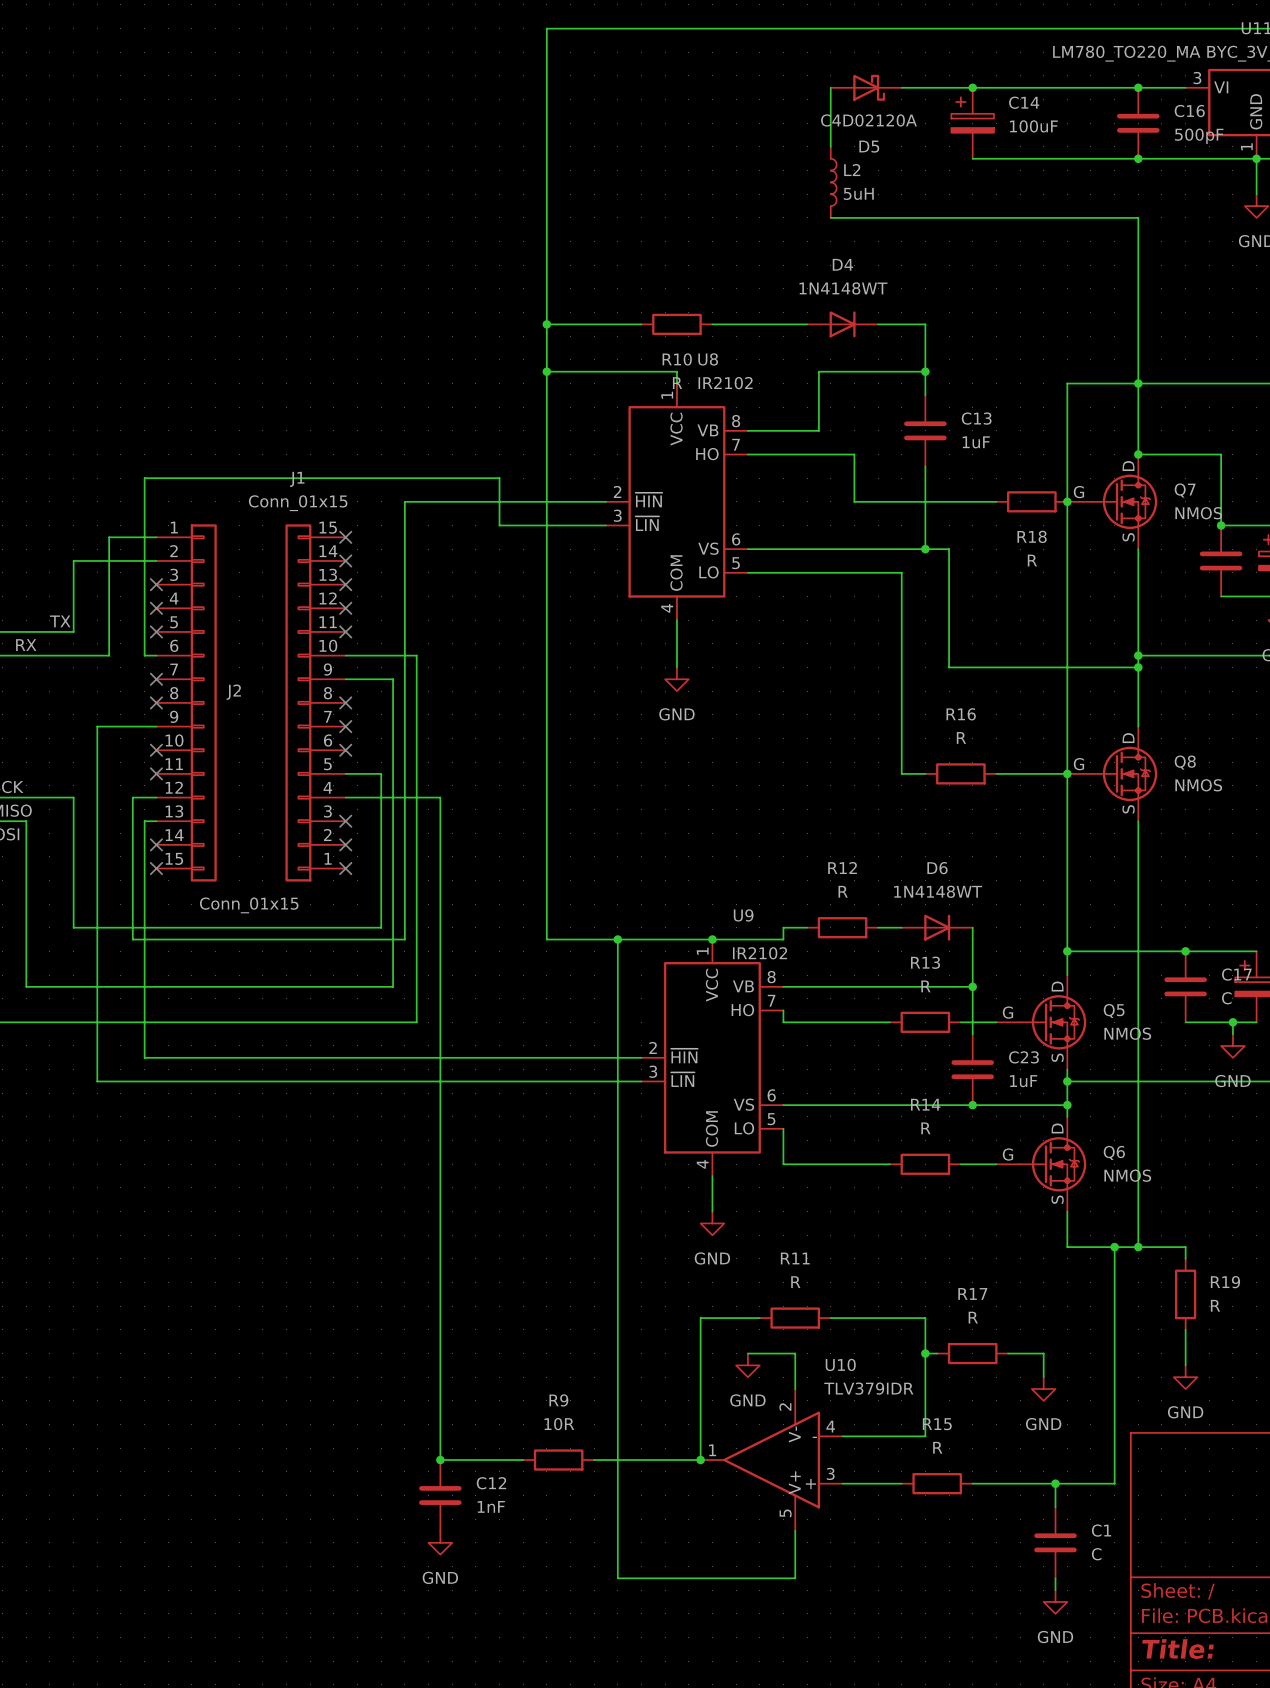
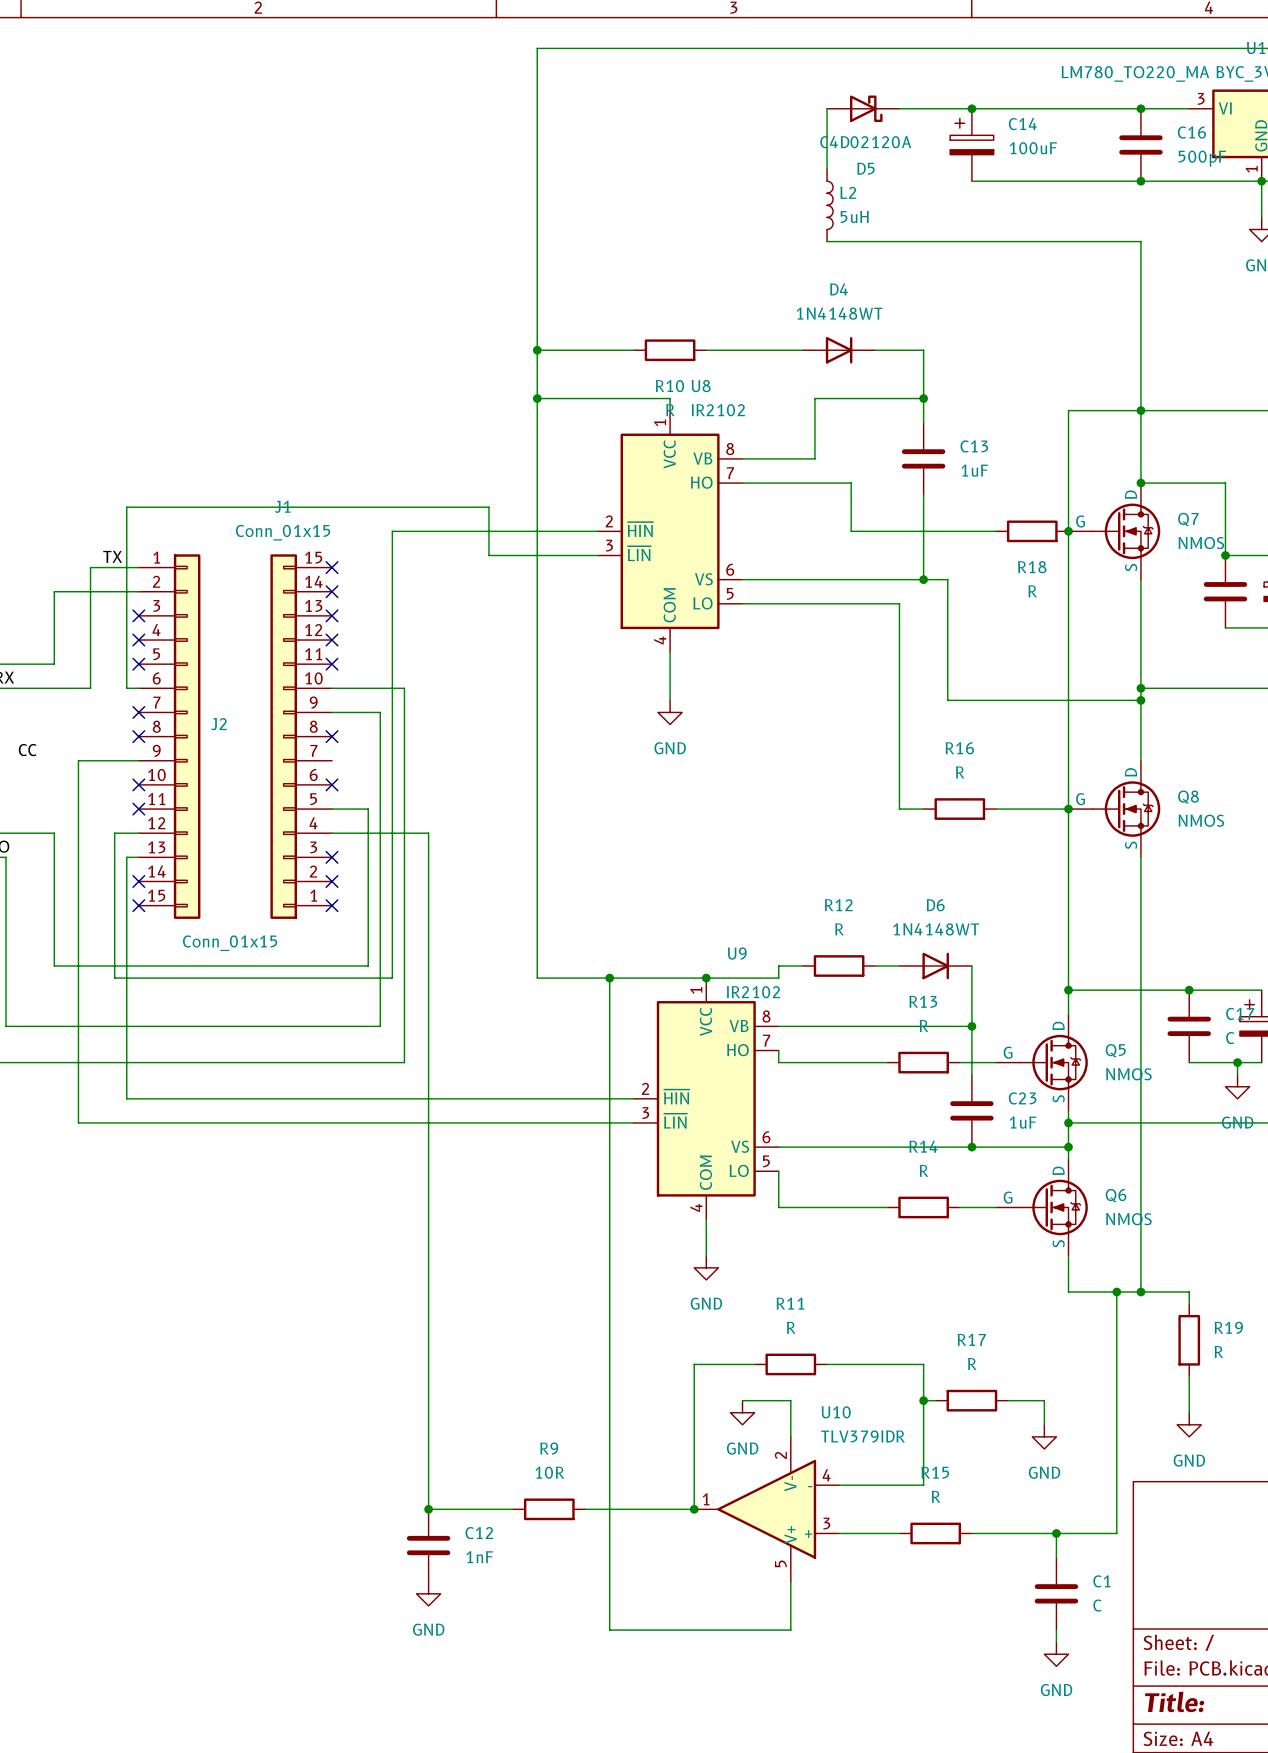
label position: TX (60, 621) -> TX (112, 556)
label: none -> CC (27, 750)
no-connect mark: (345, 726) -> none

